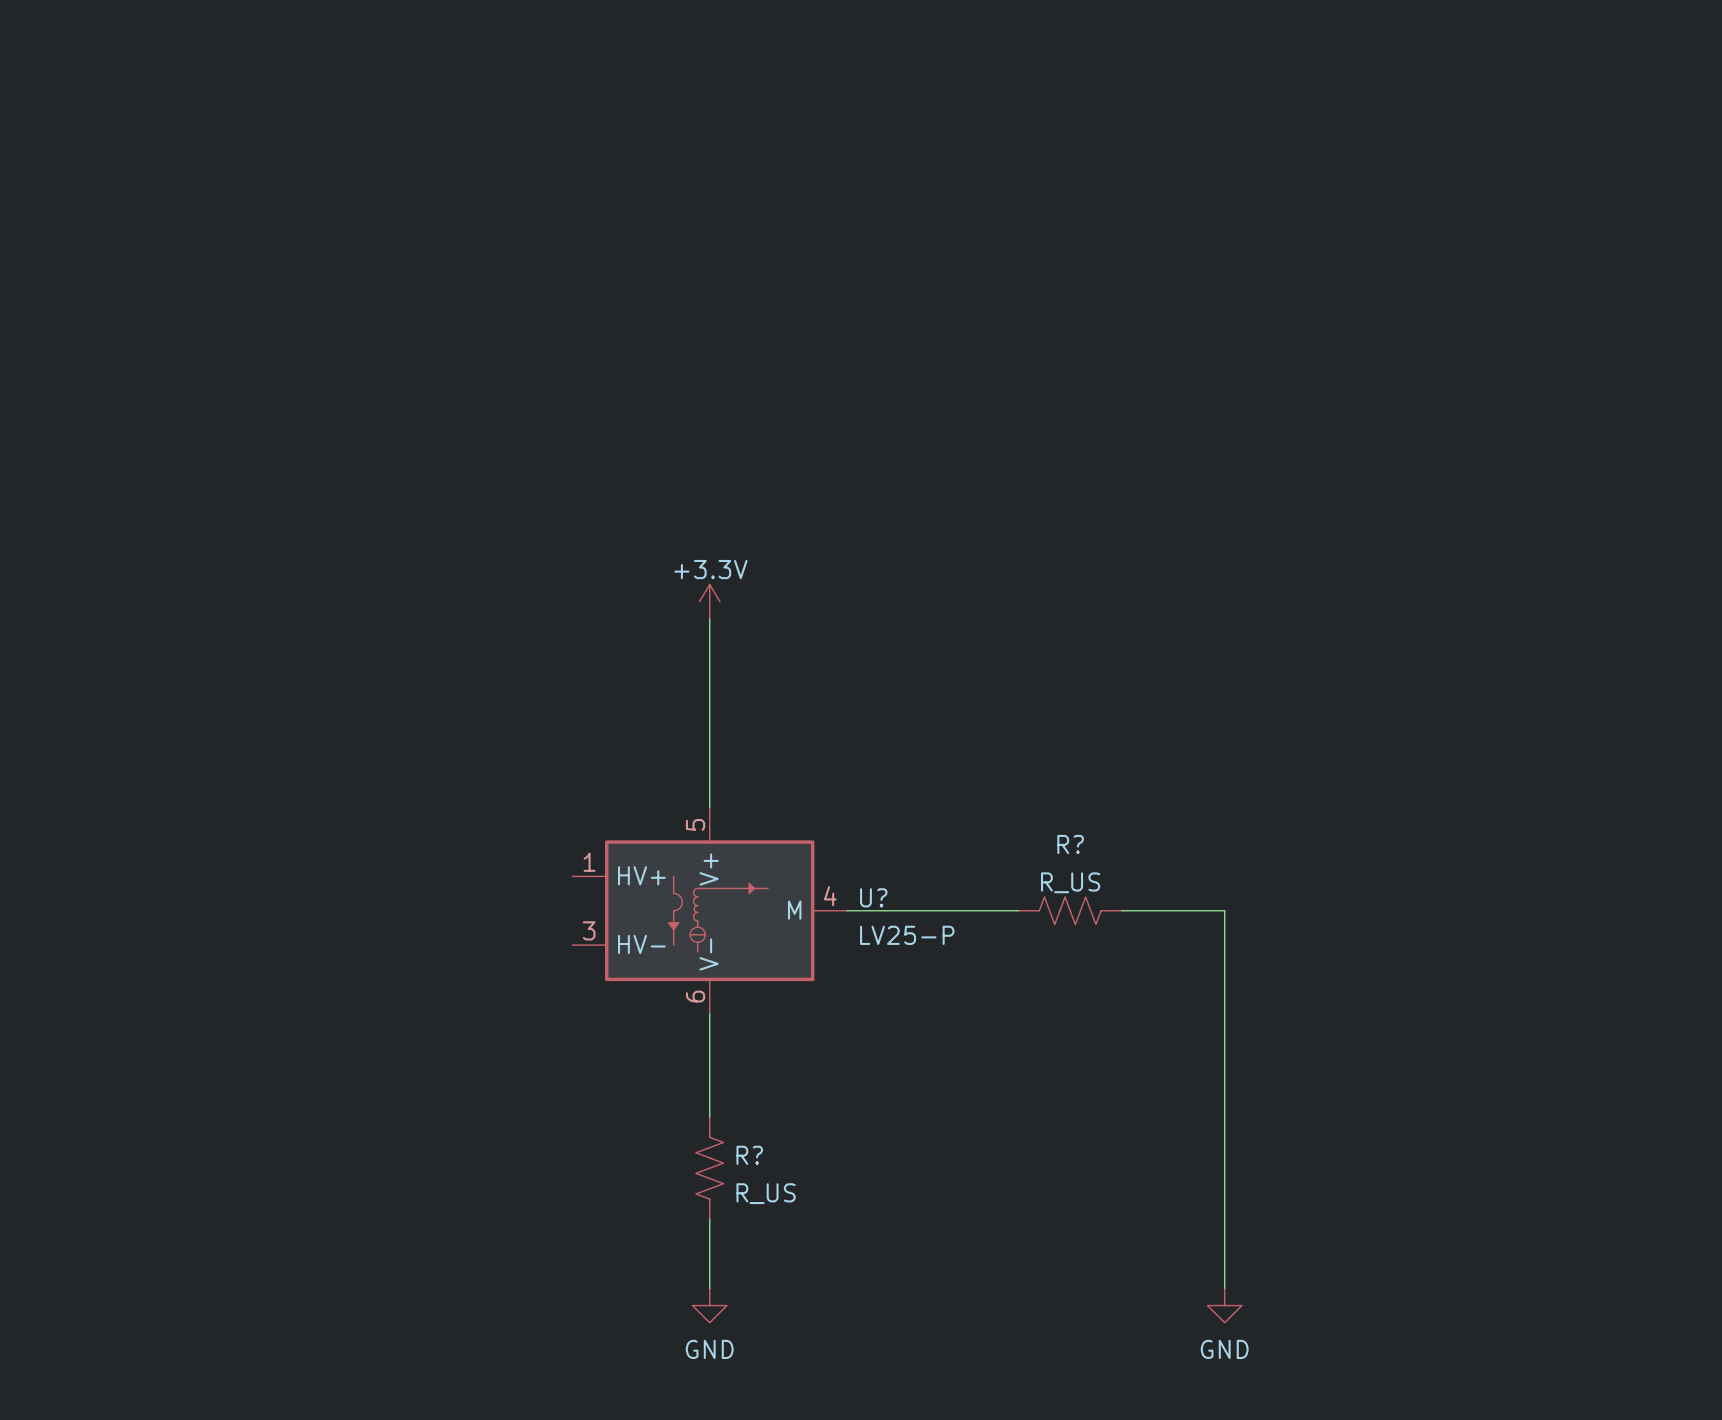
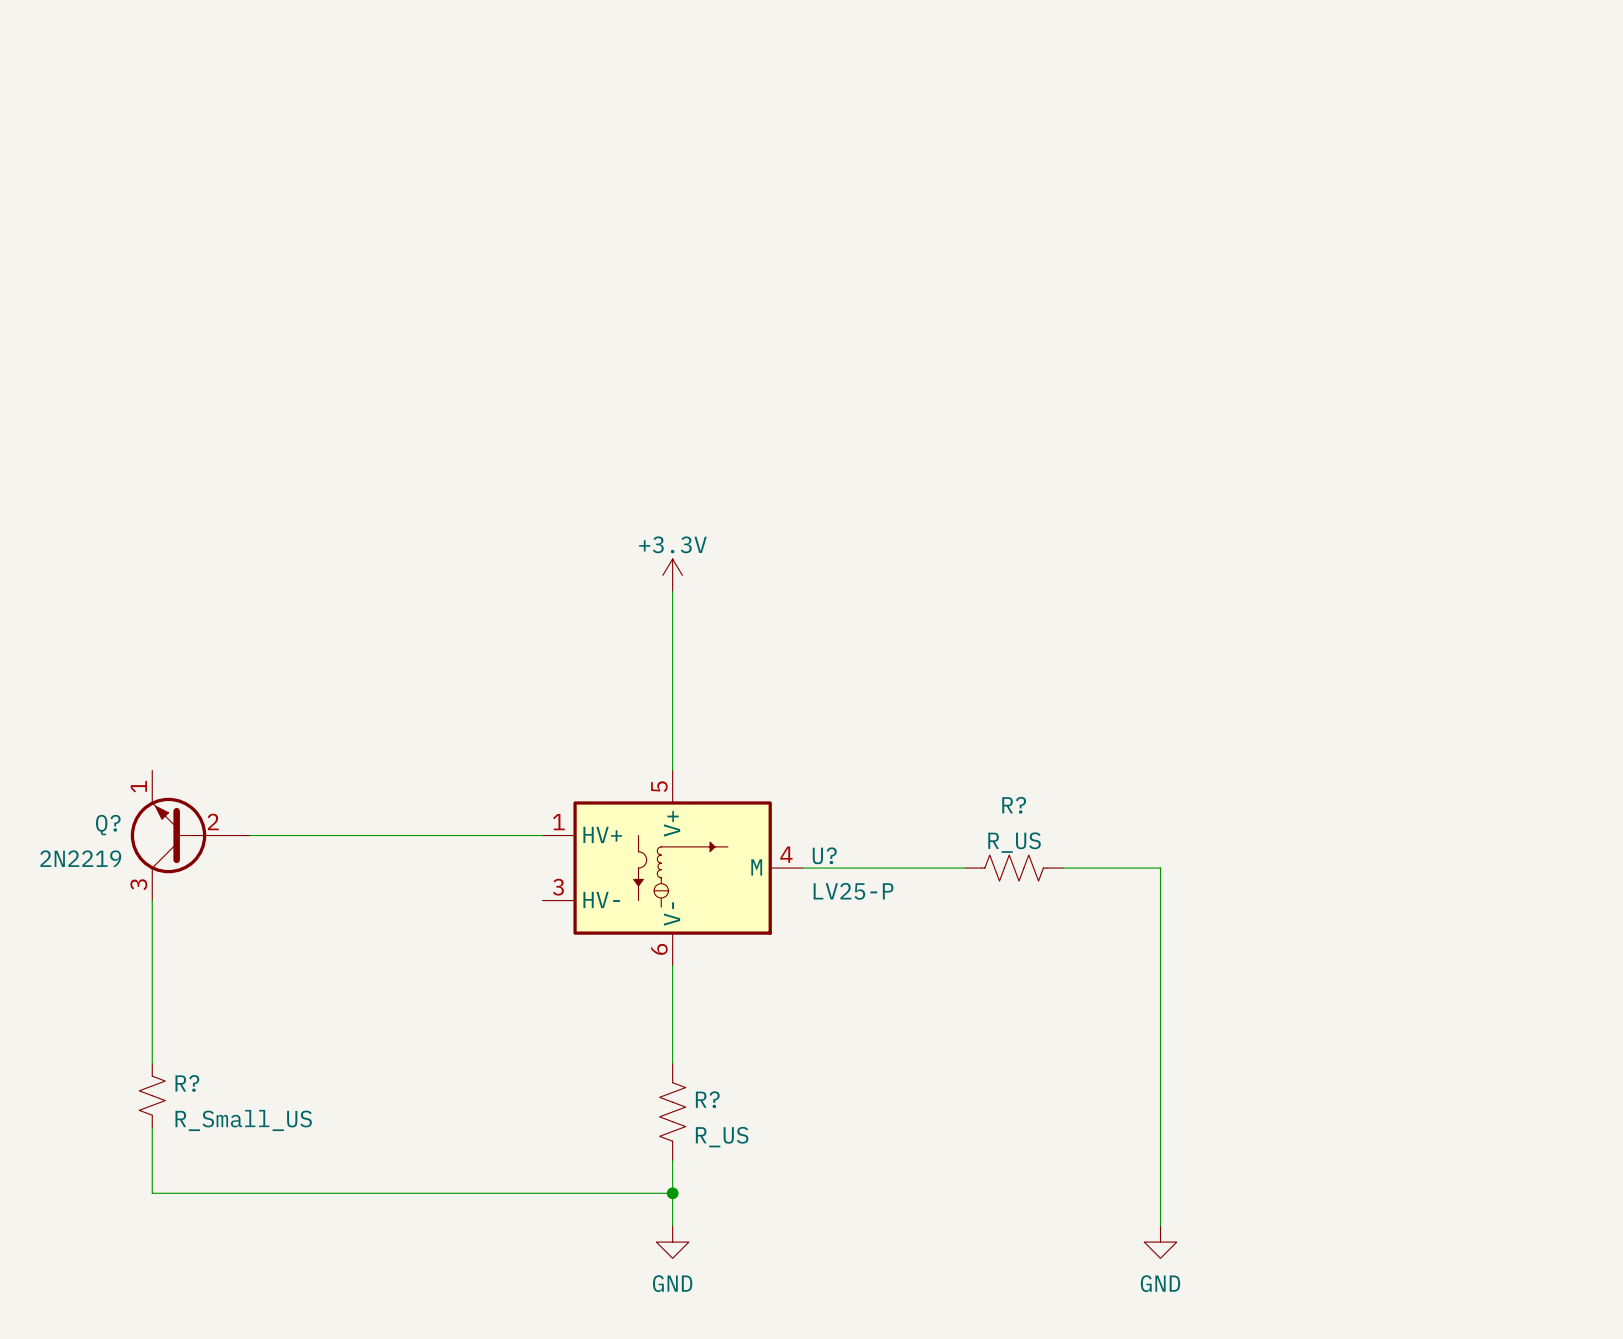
Q?: none -> 2N2219 (190, 835)
wire: none -> (249, 835) (542, 835)
wire: none -> (152, 900) (152, 1063)
R?: none -> R_Small_US (152, 1095)
wire: none -> (152, 1128) (152, 1193) (672, 1193)
junction: none -> (672, 1193)

